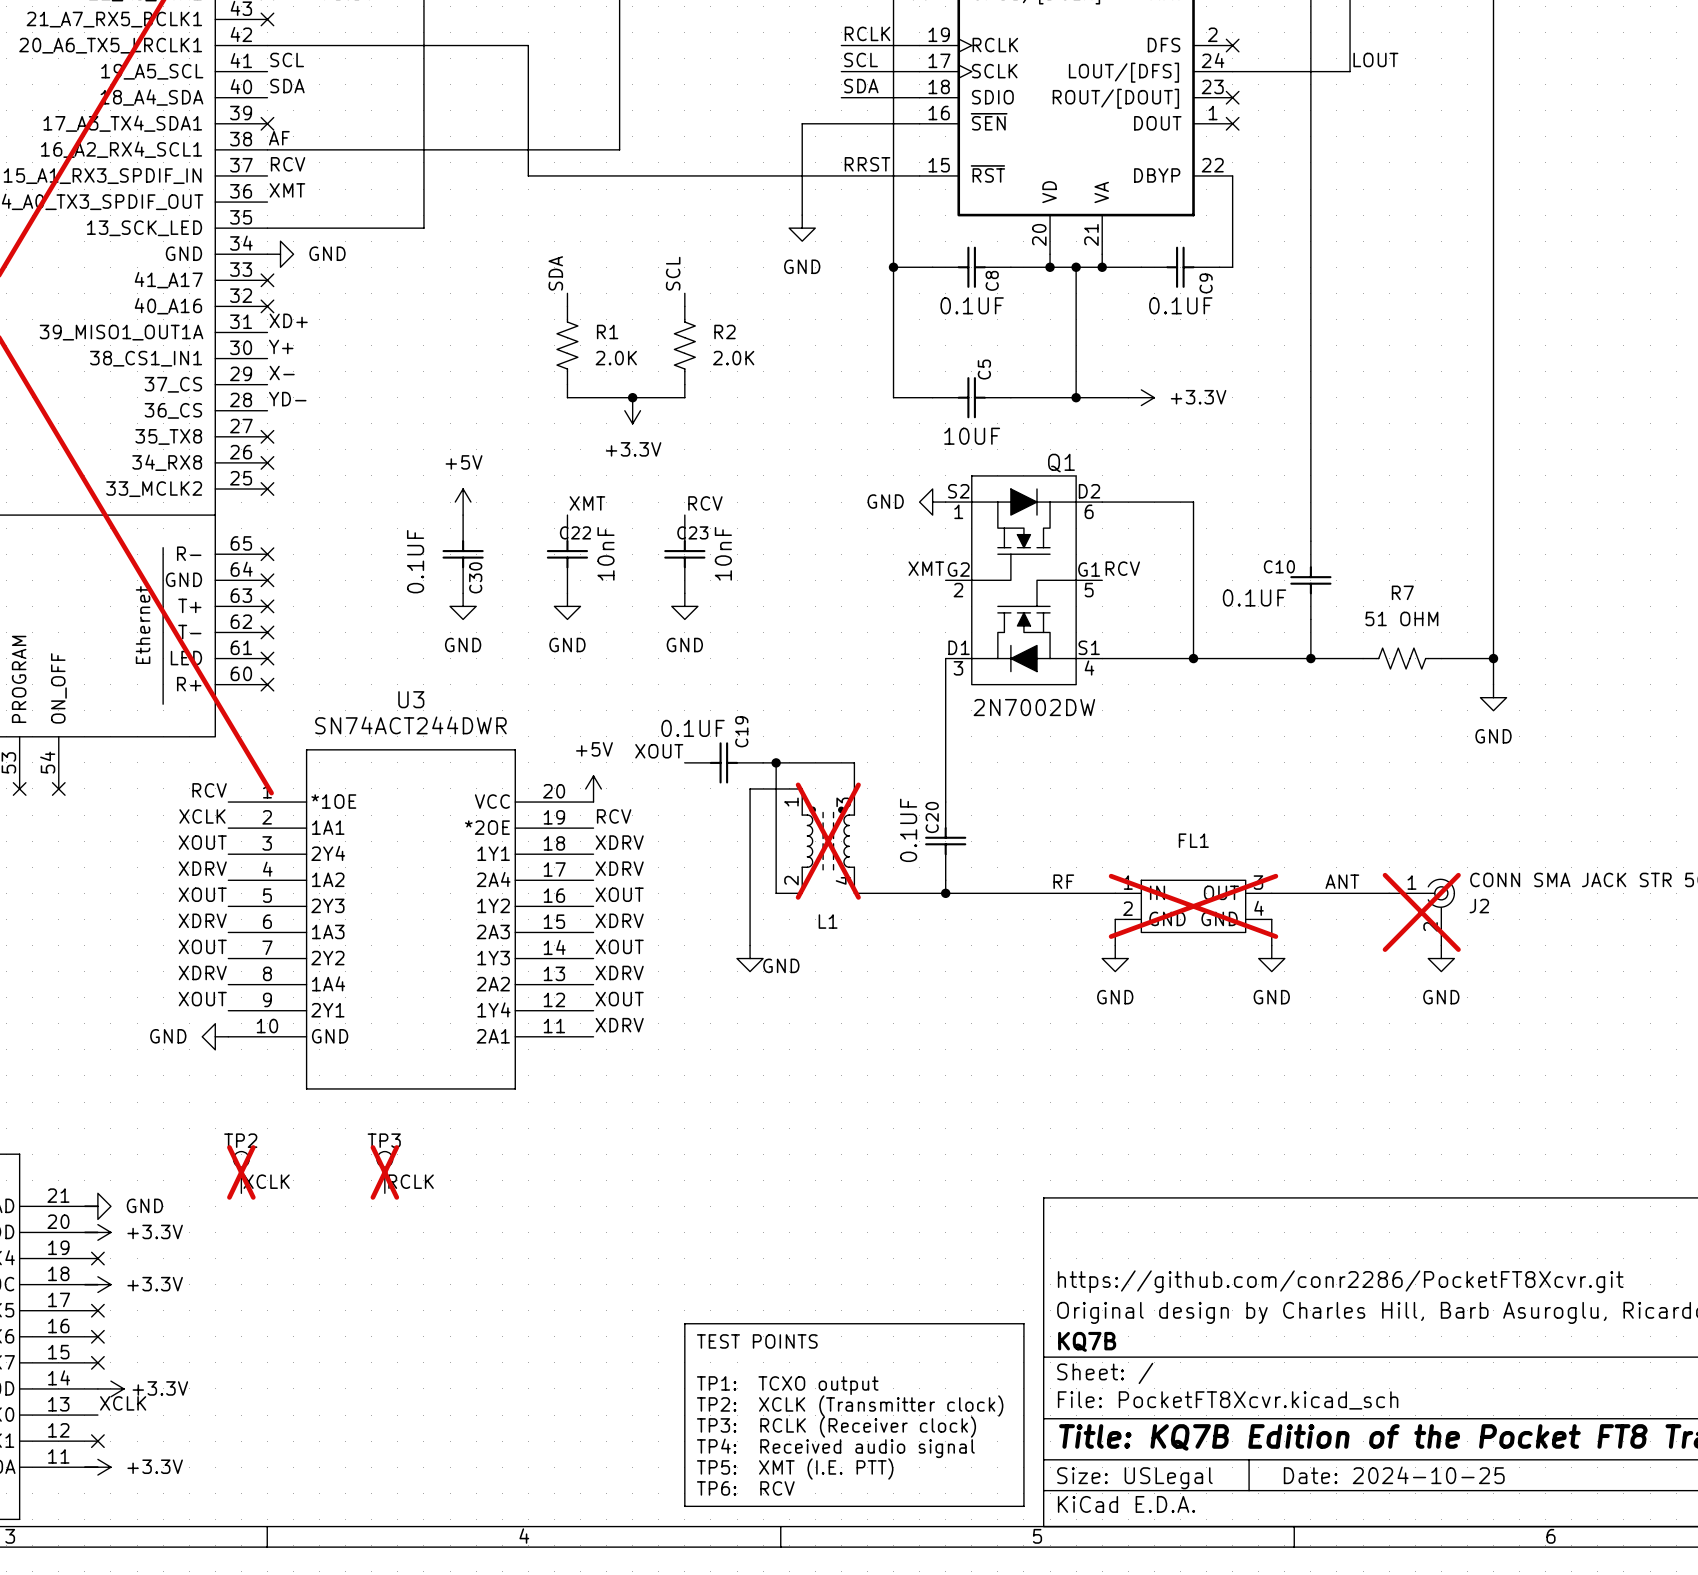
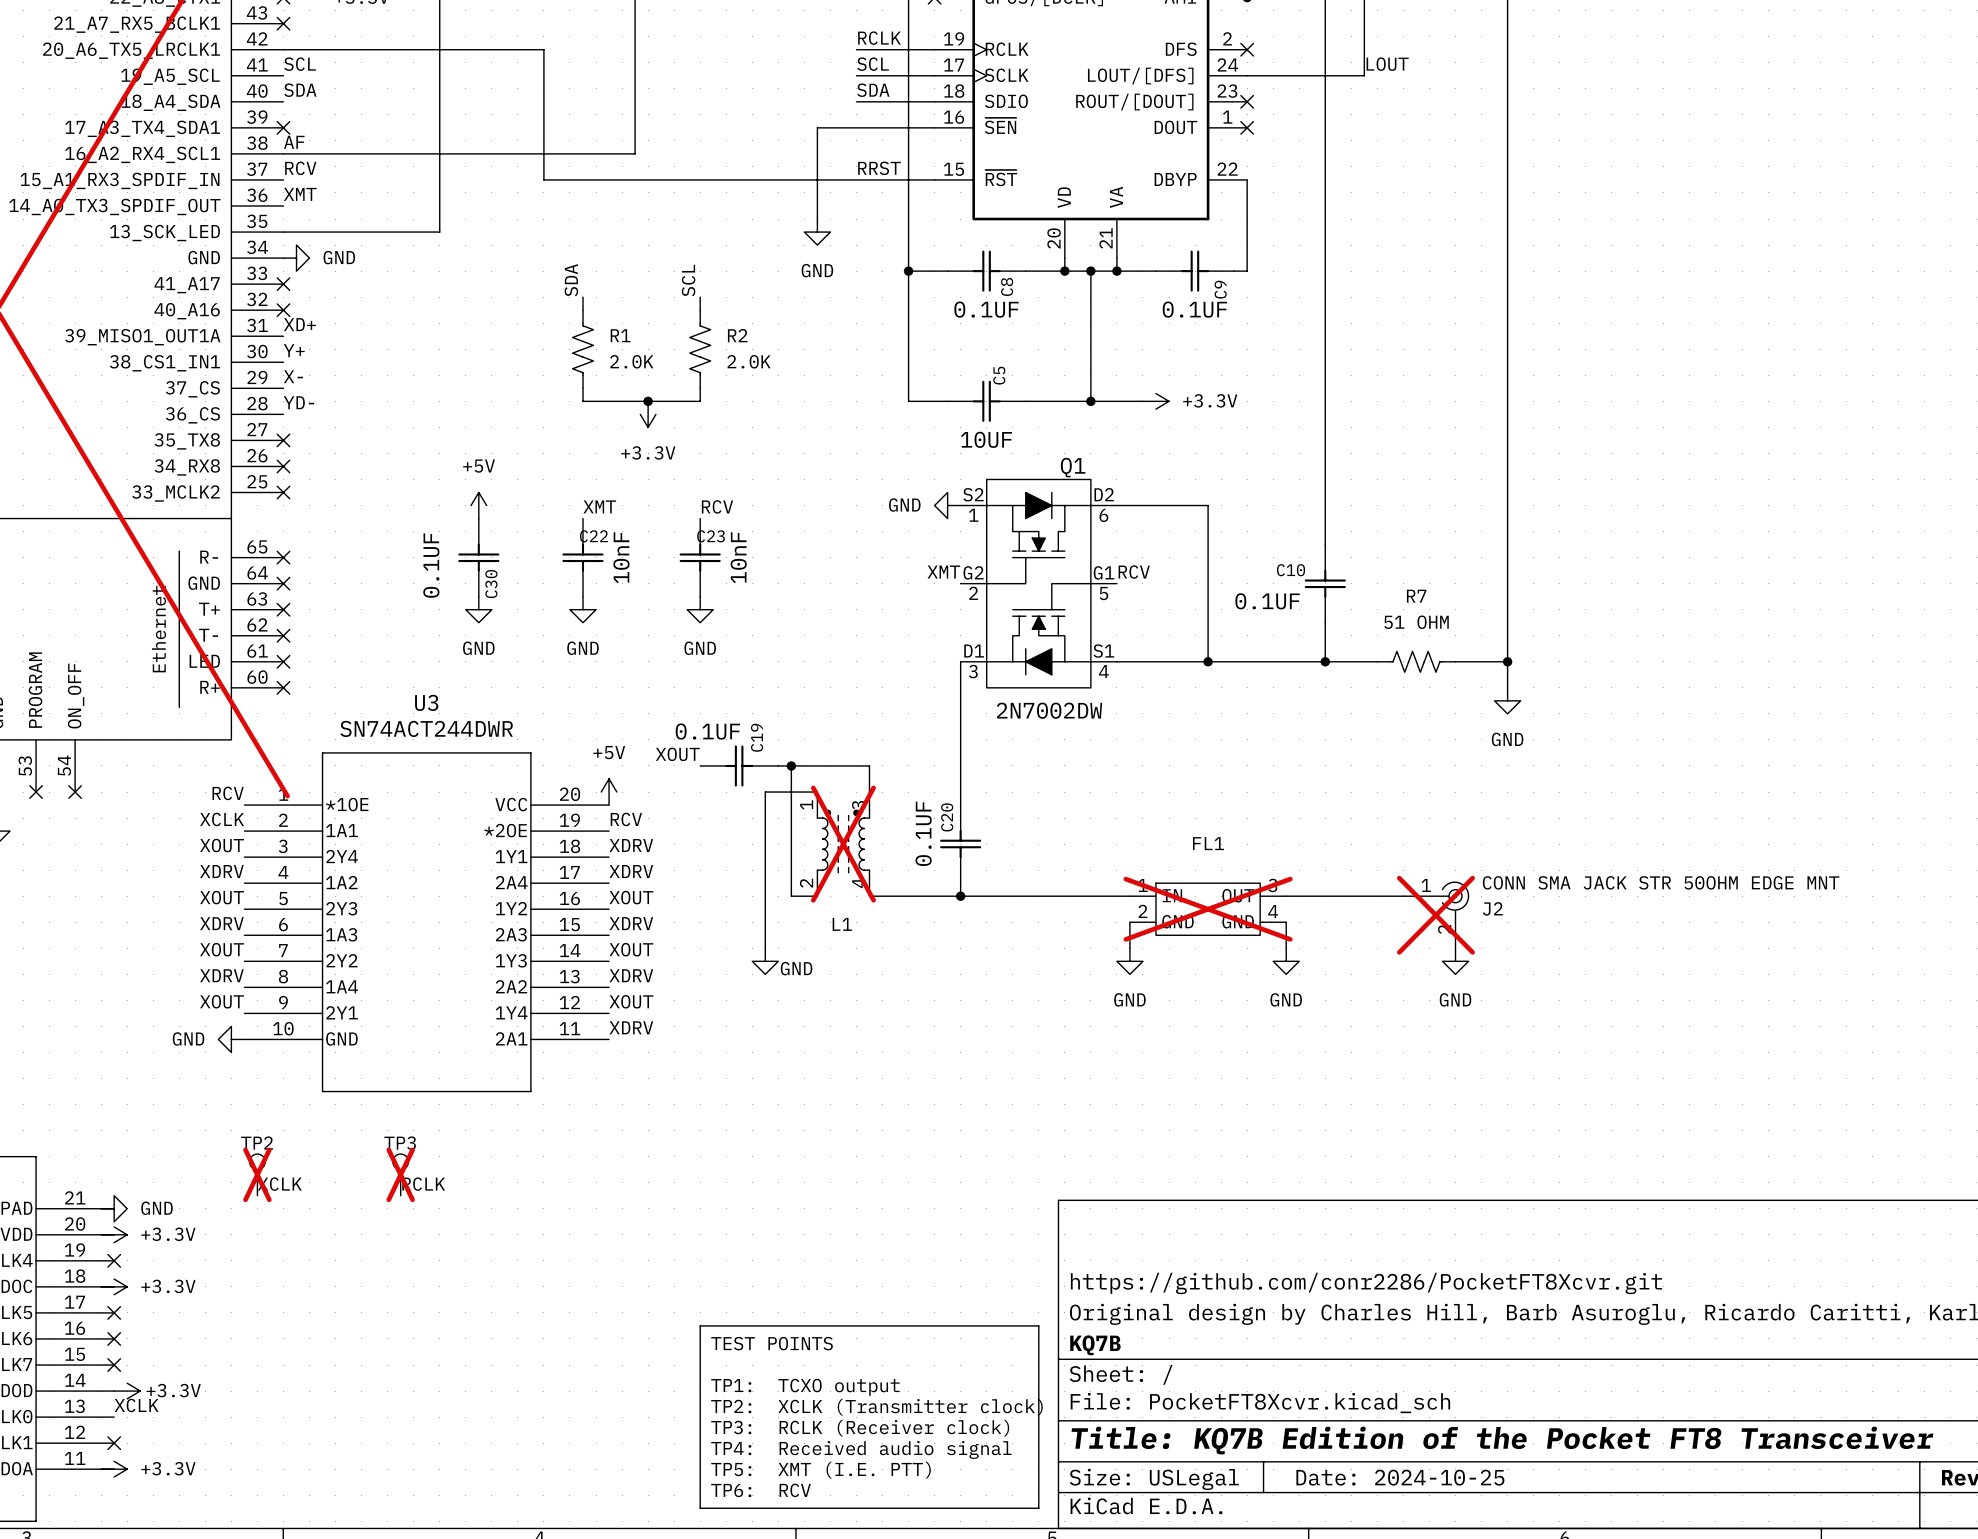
label: RF (1063, 881) -> none
label: ANT (1342, 881) -> none

